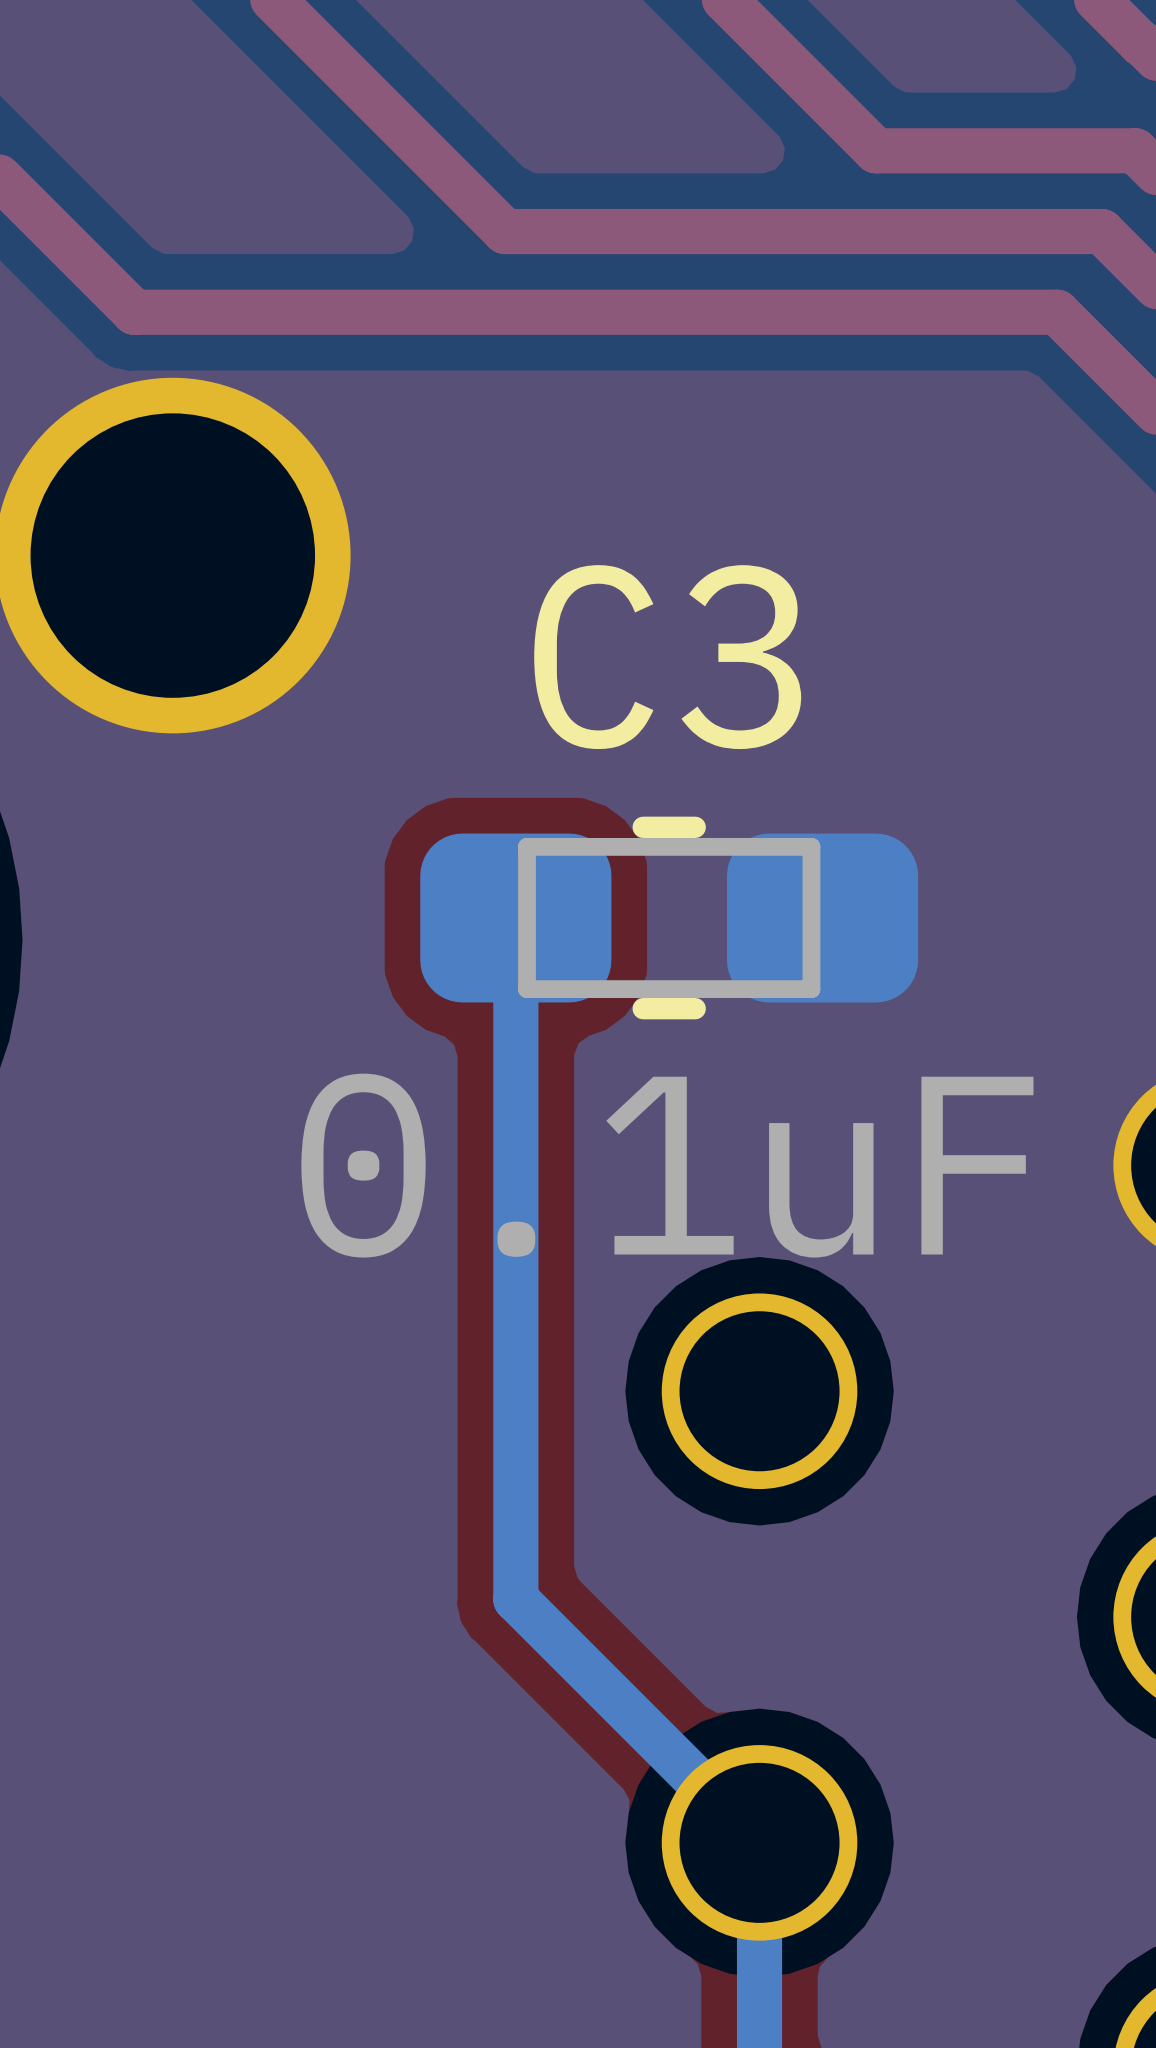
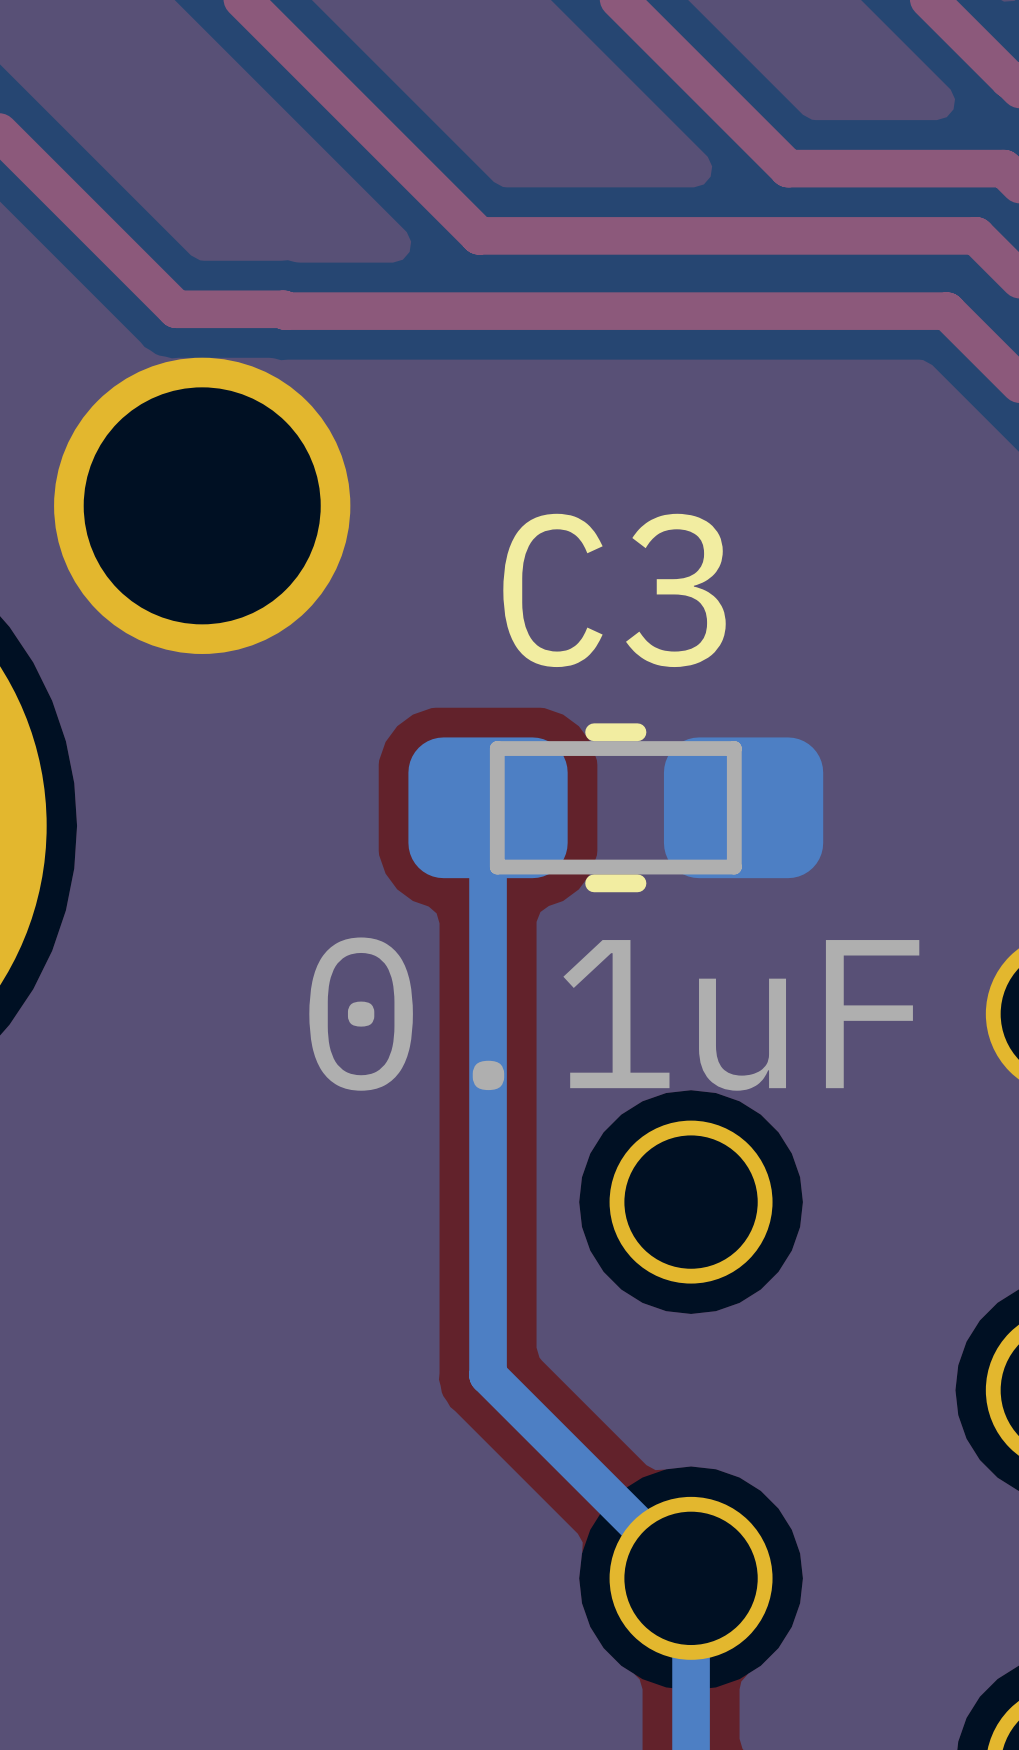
top track: (134, 312) (1057, 312) (1066, 321) -> (285, 311) (946, 311)
top track: none -> (170, 303) (176, 309) (283, 309)

